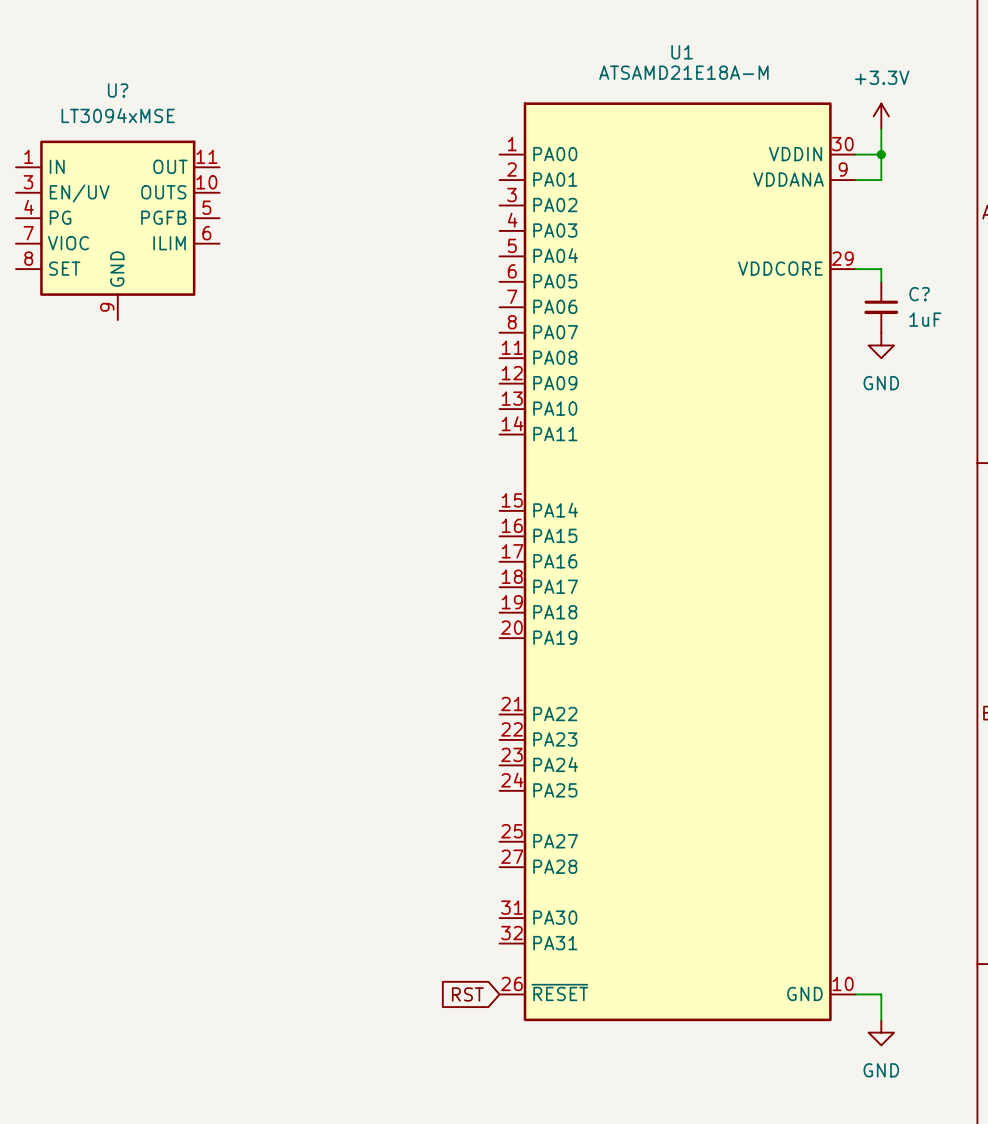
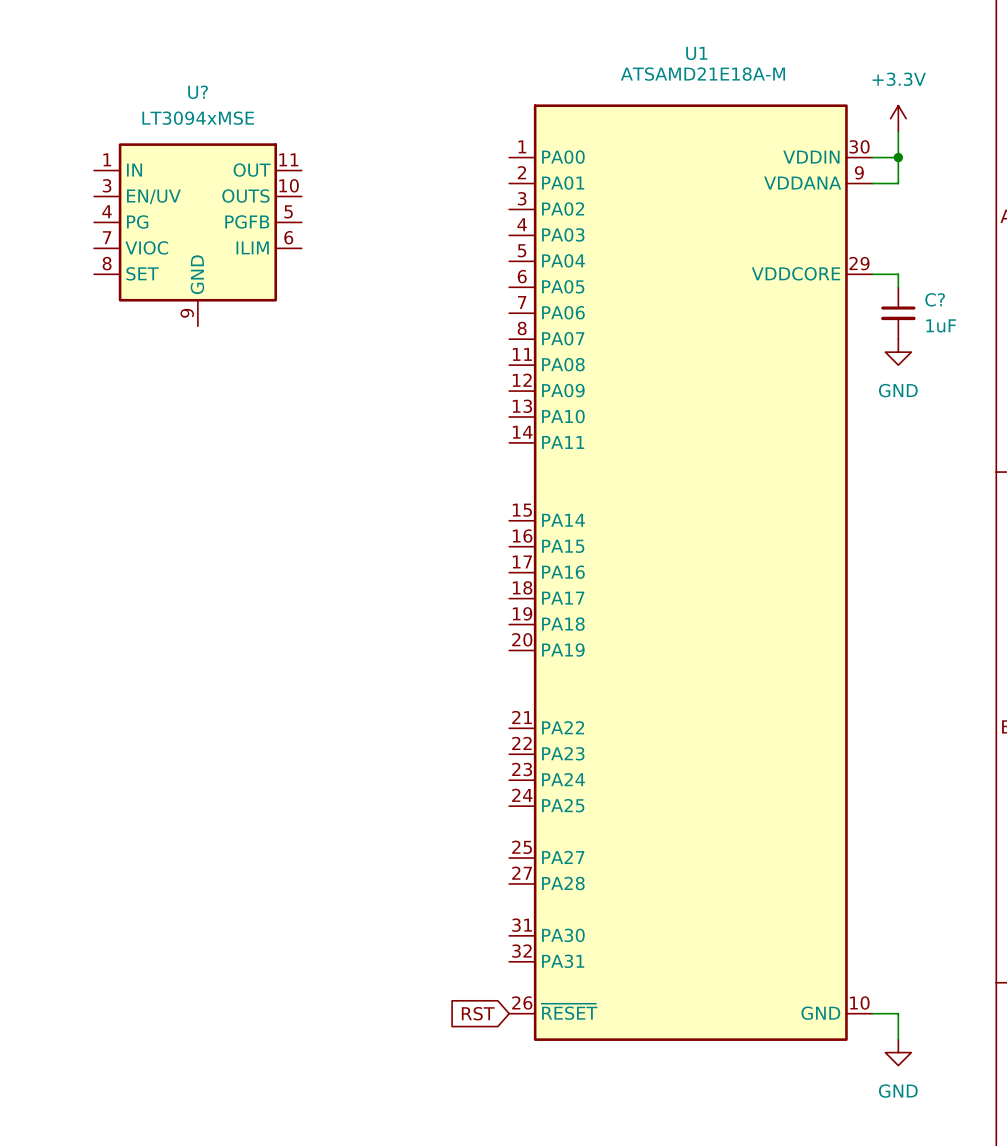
U? position: (117, 230) -> (197, 234)

